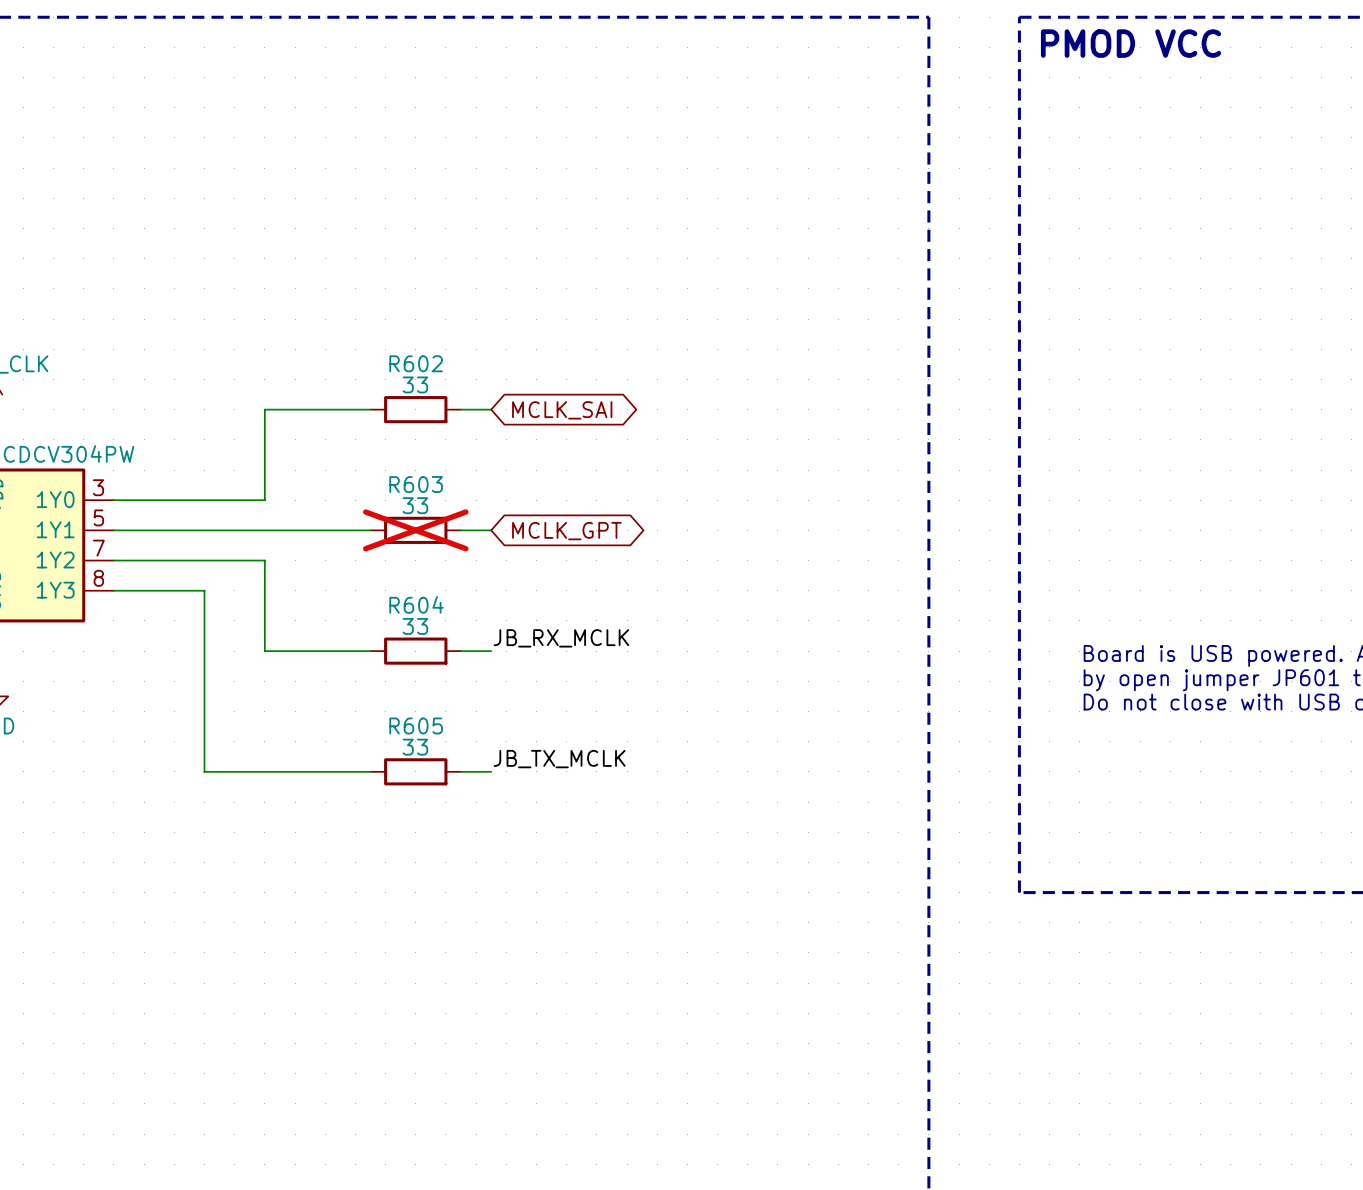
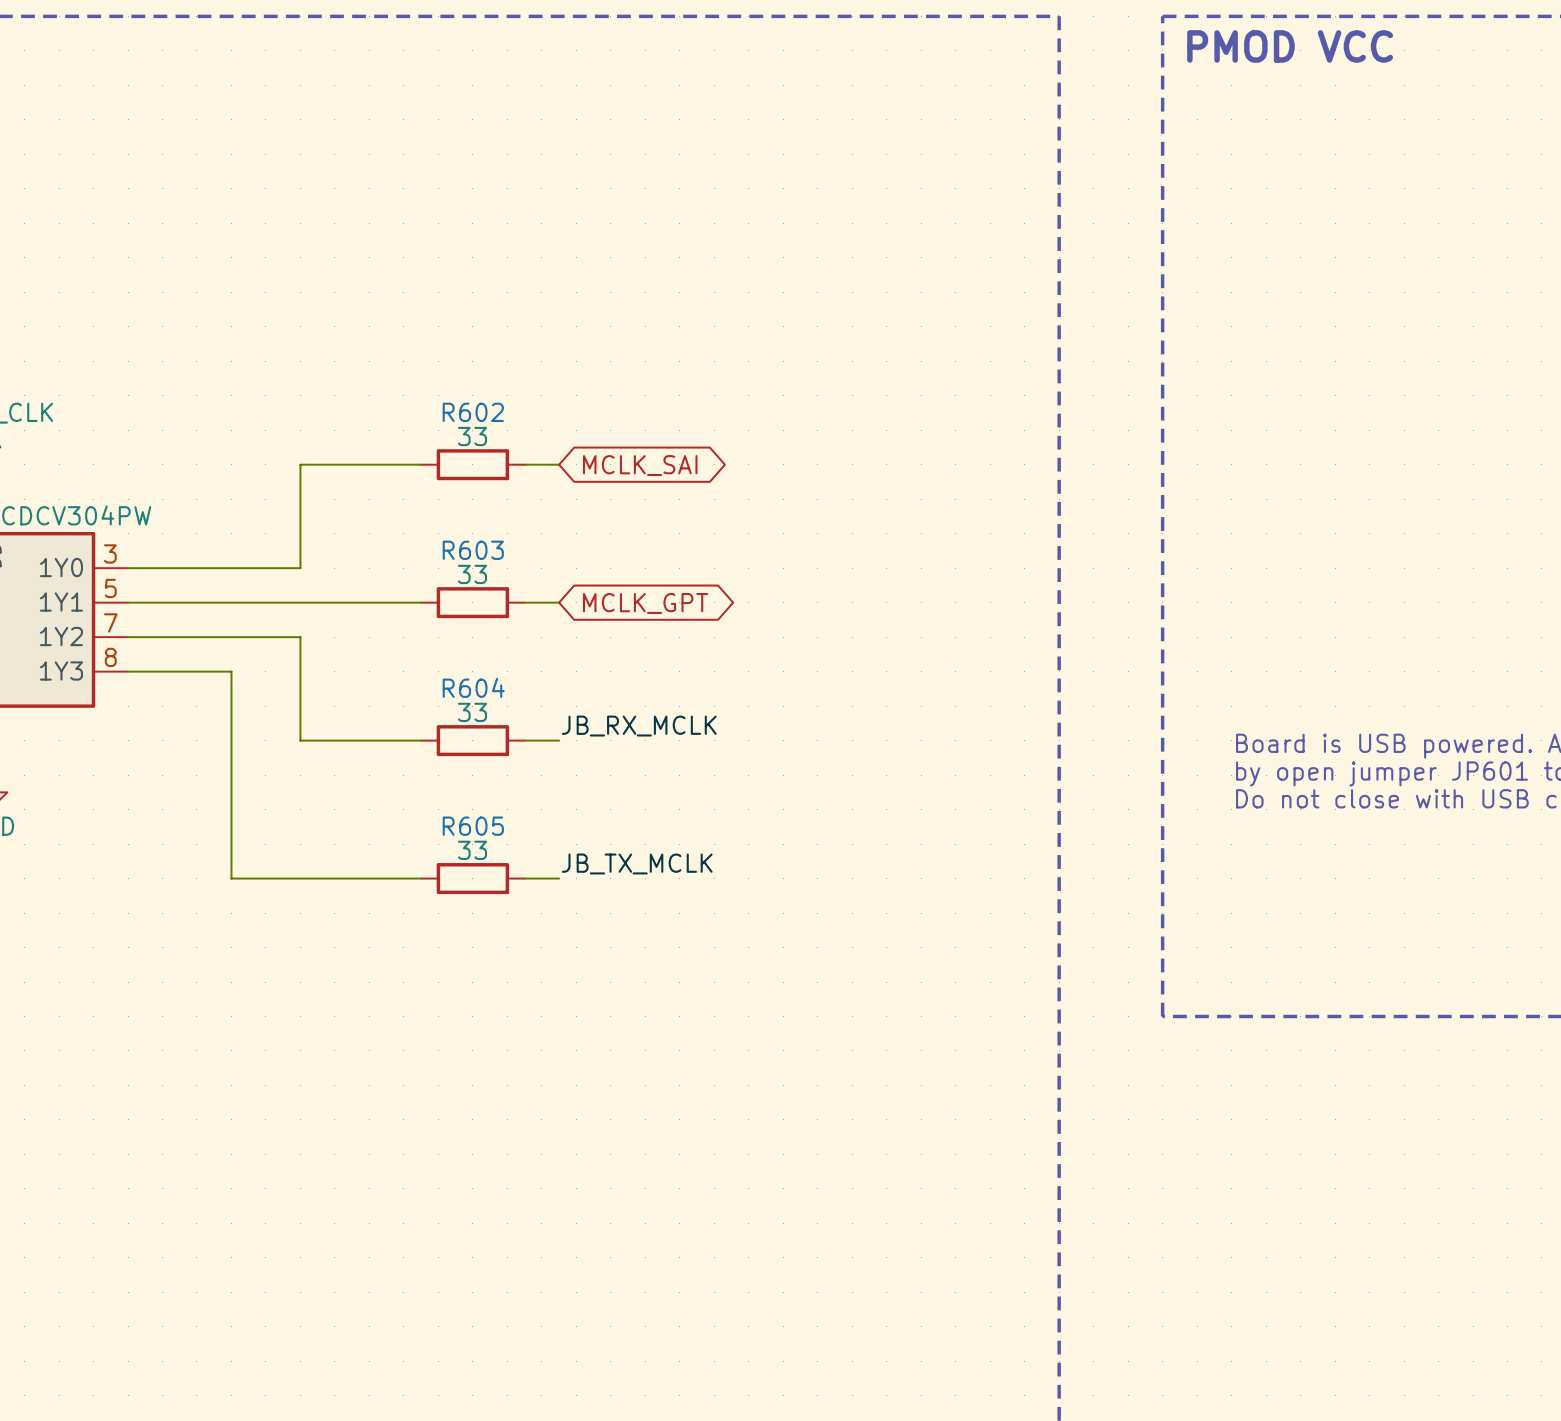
R603 do-not-place cross: (415, 530) -> none

